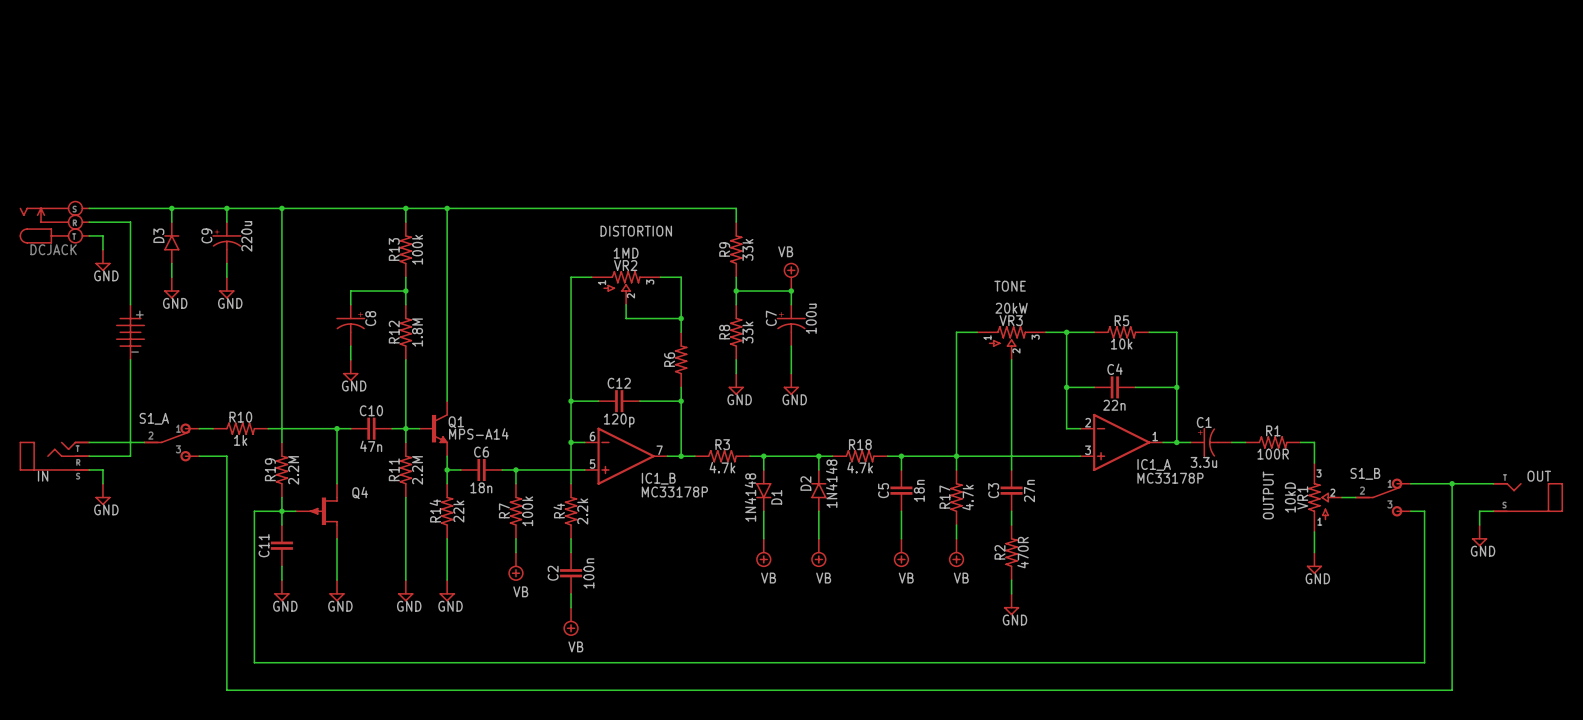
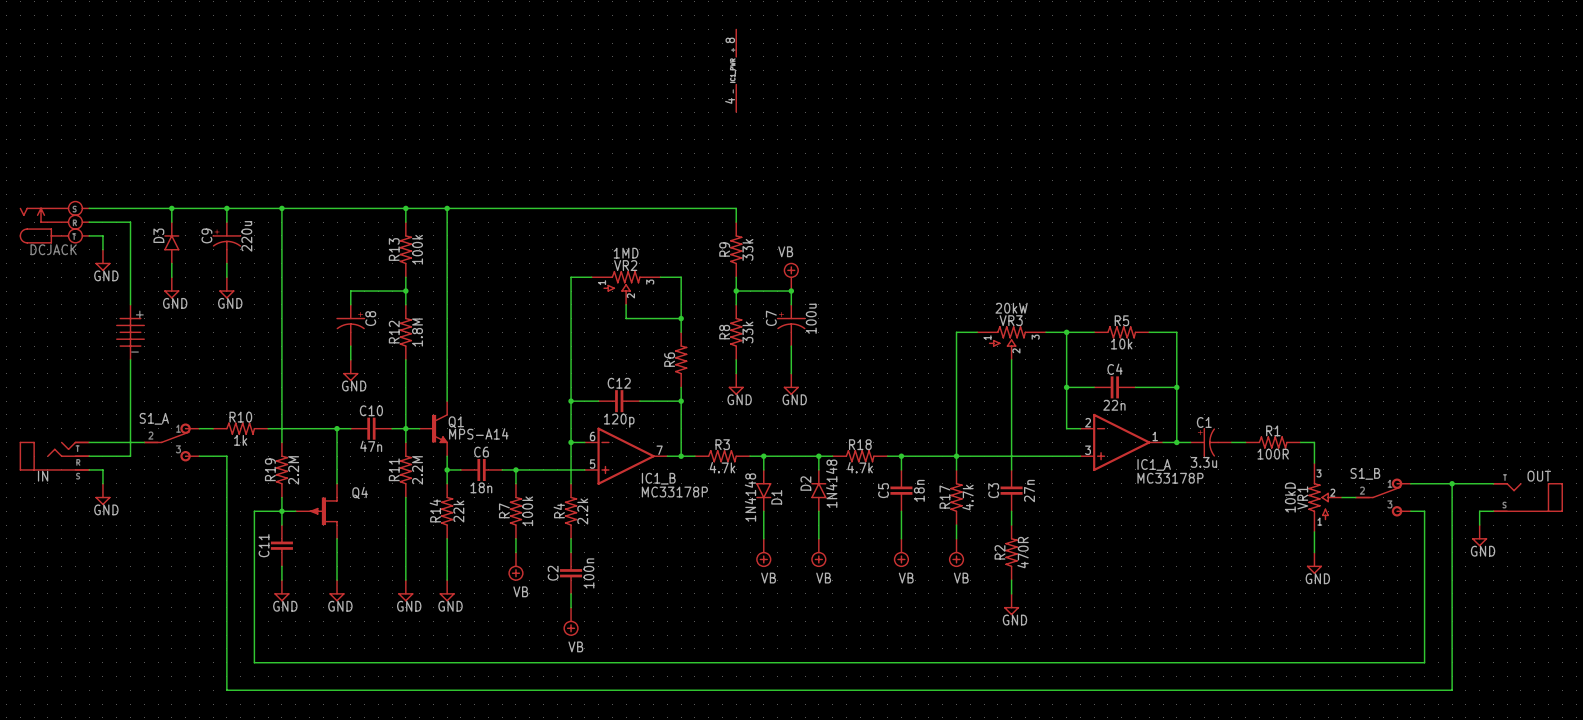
part: none -> (736, 70)
text: DISTORTION (636, 231) -> none
text: TONE (1010, 286) -> none
text: OUTPUT (1268, 495) -> none

